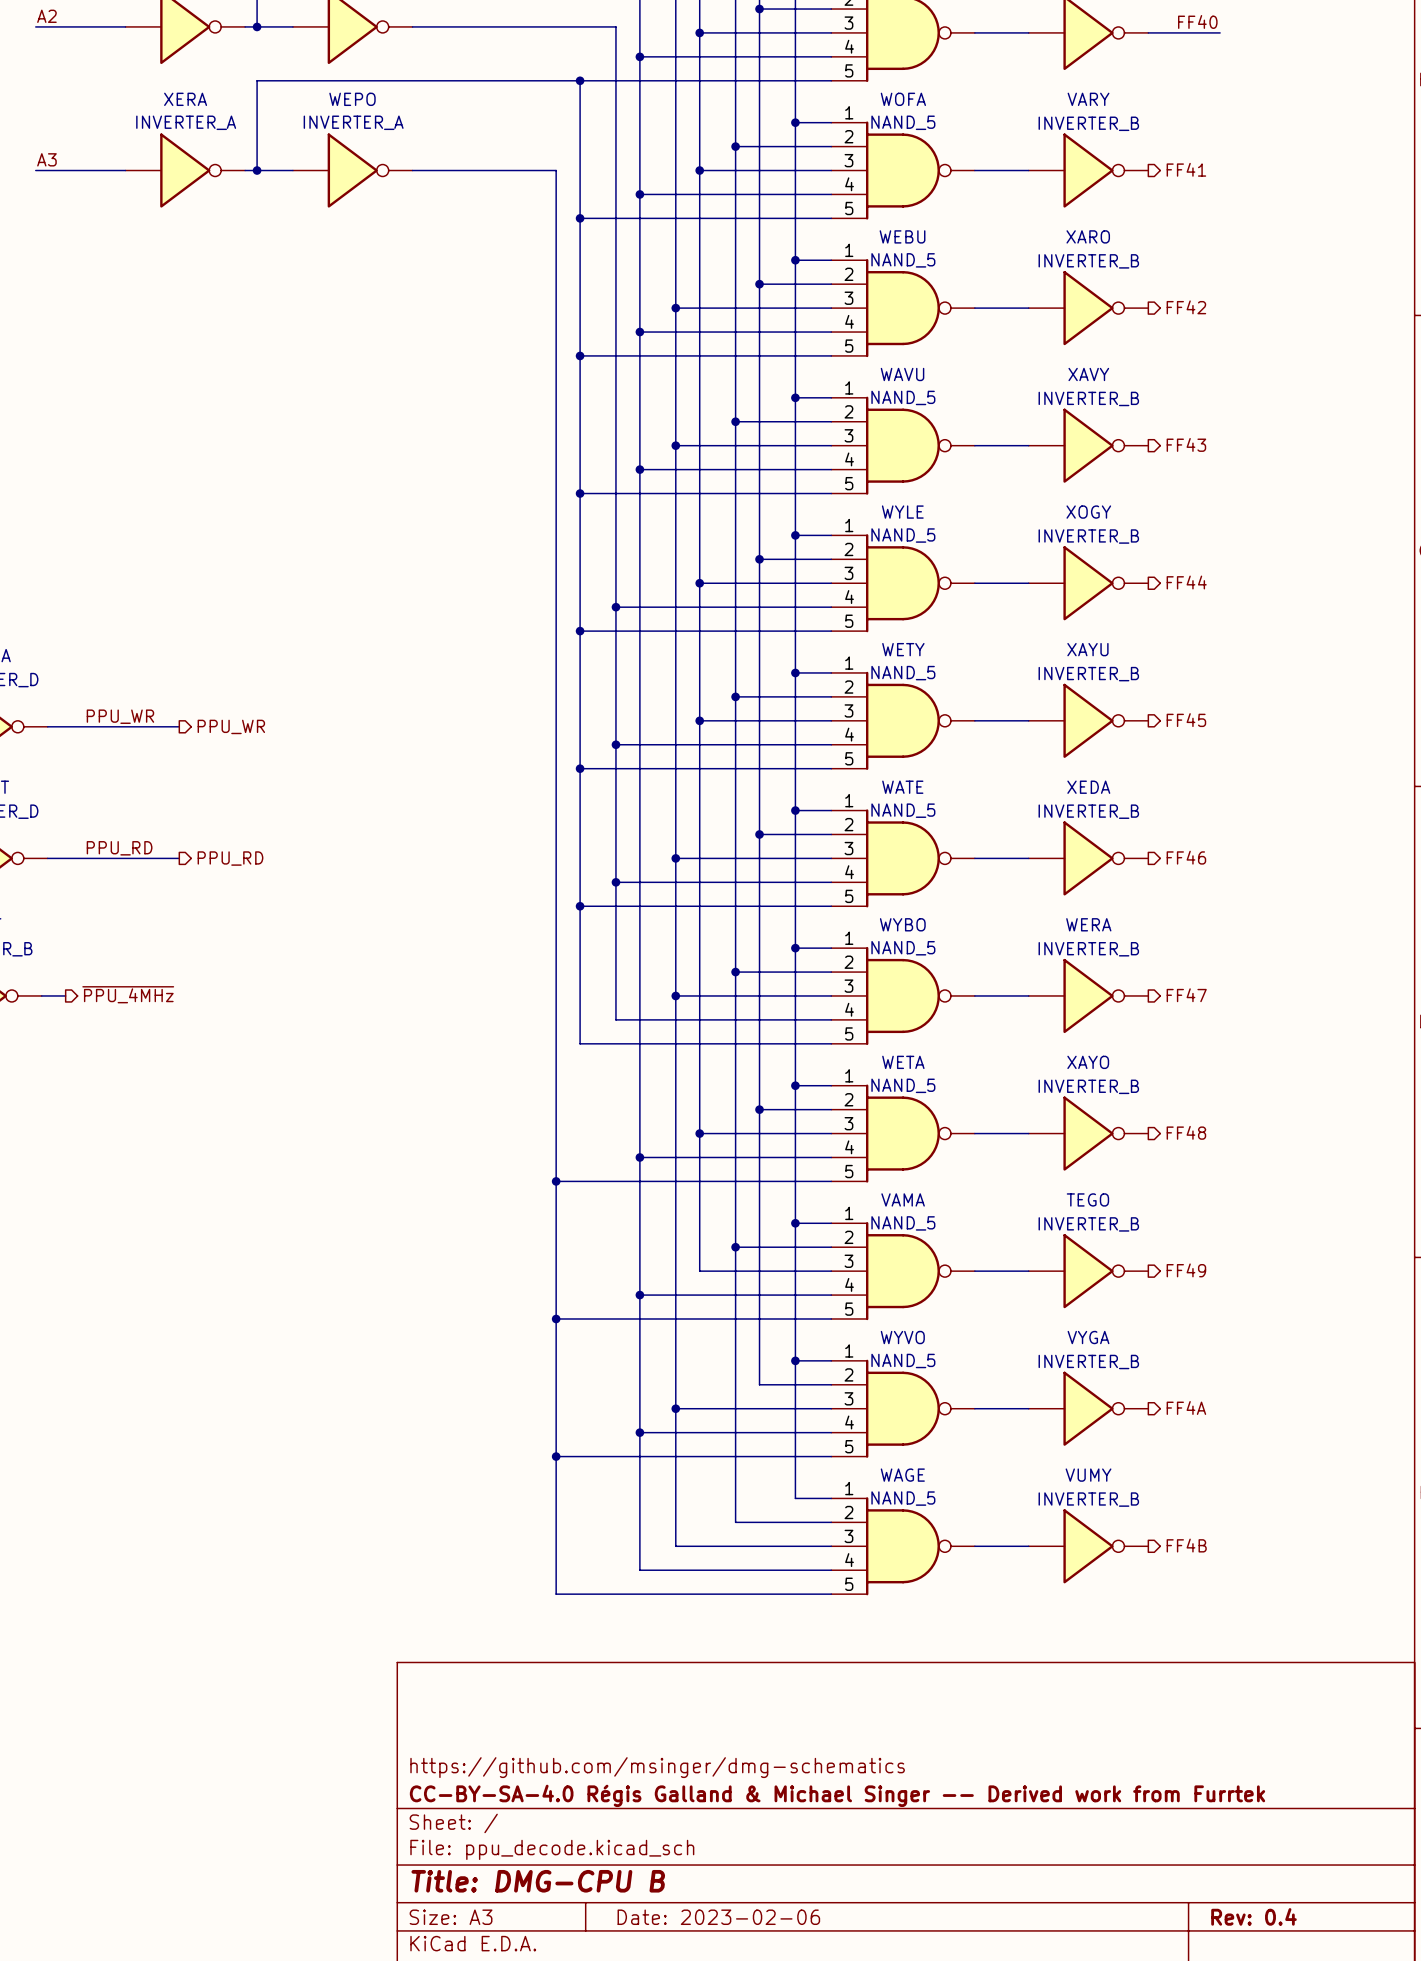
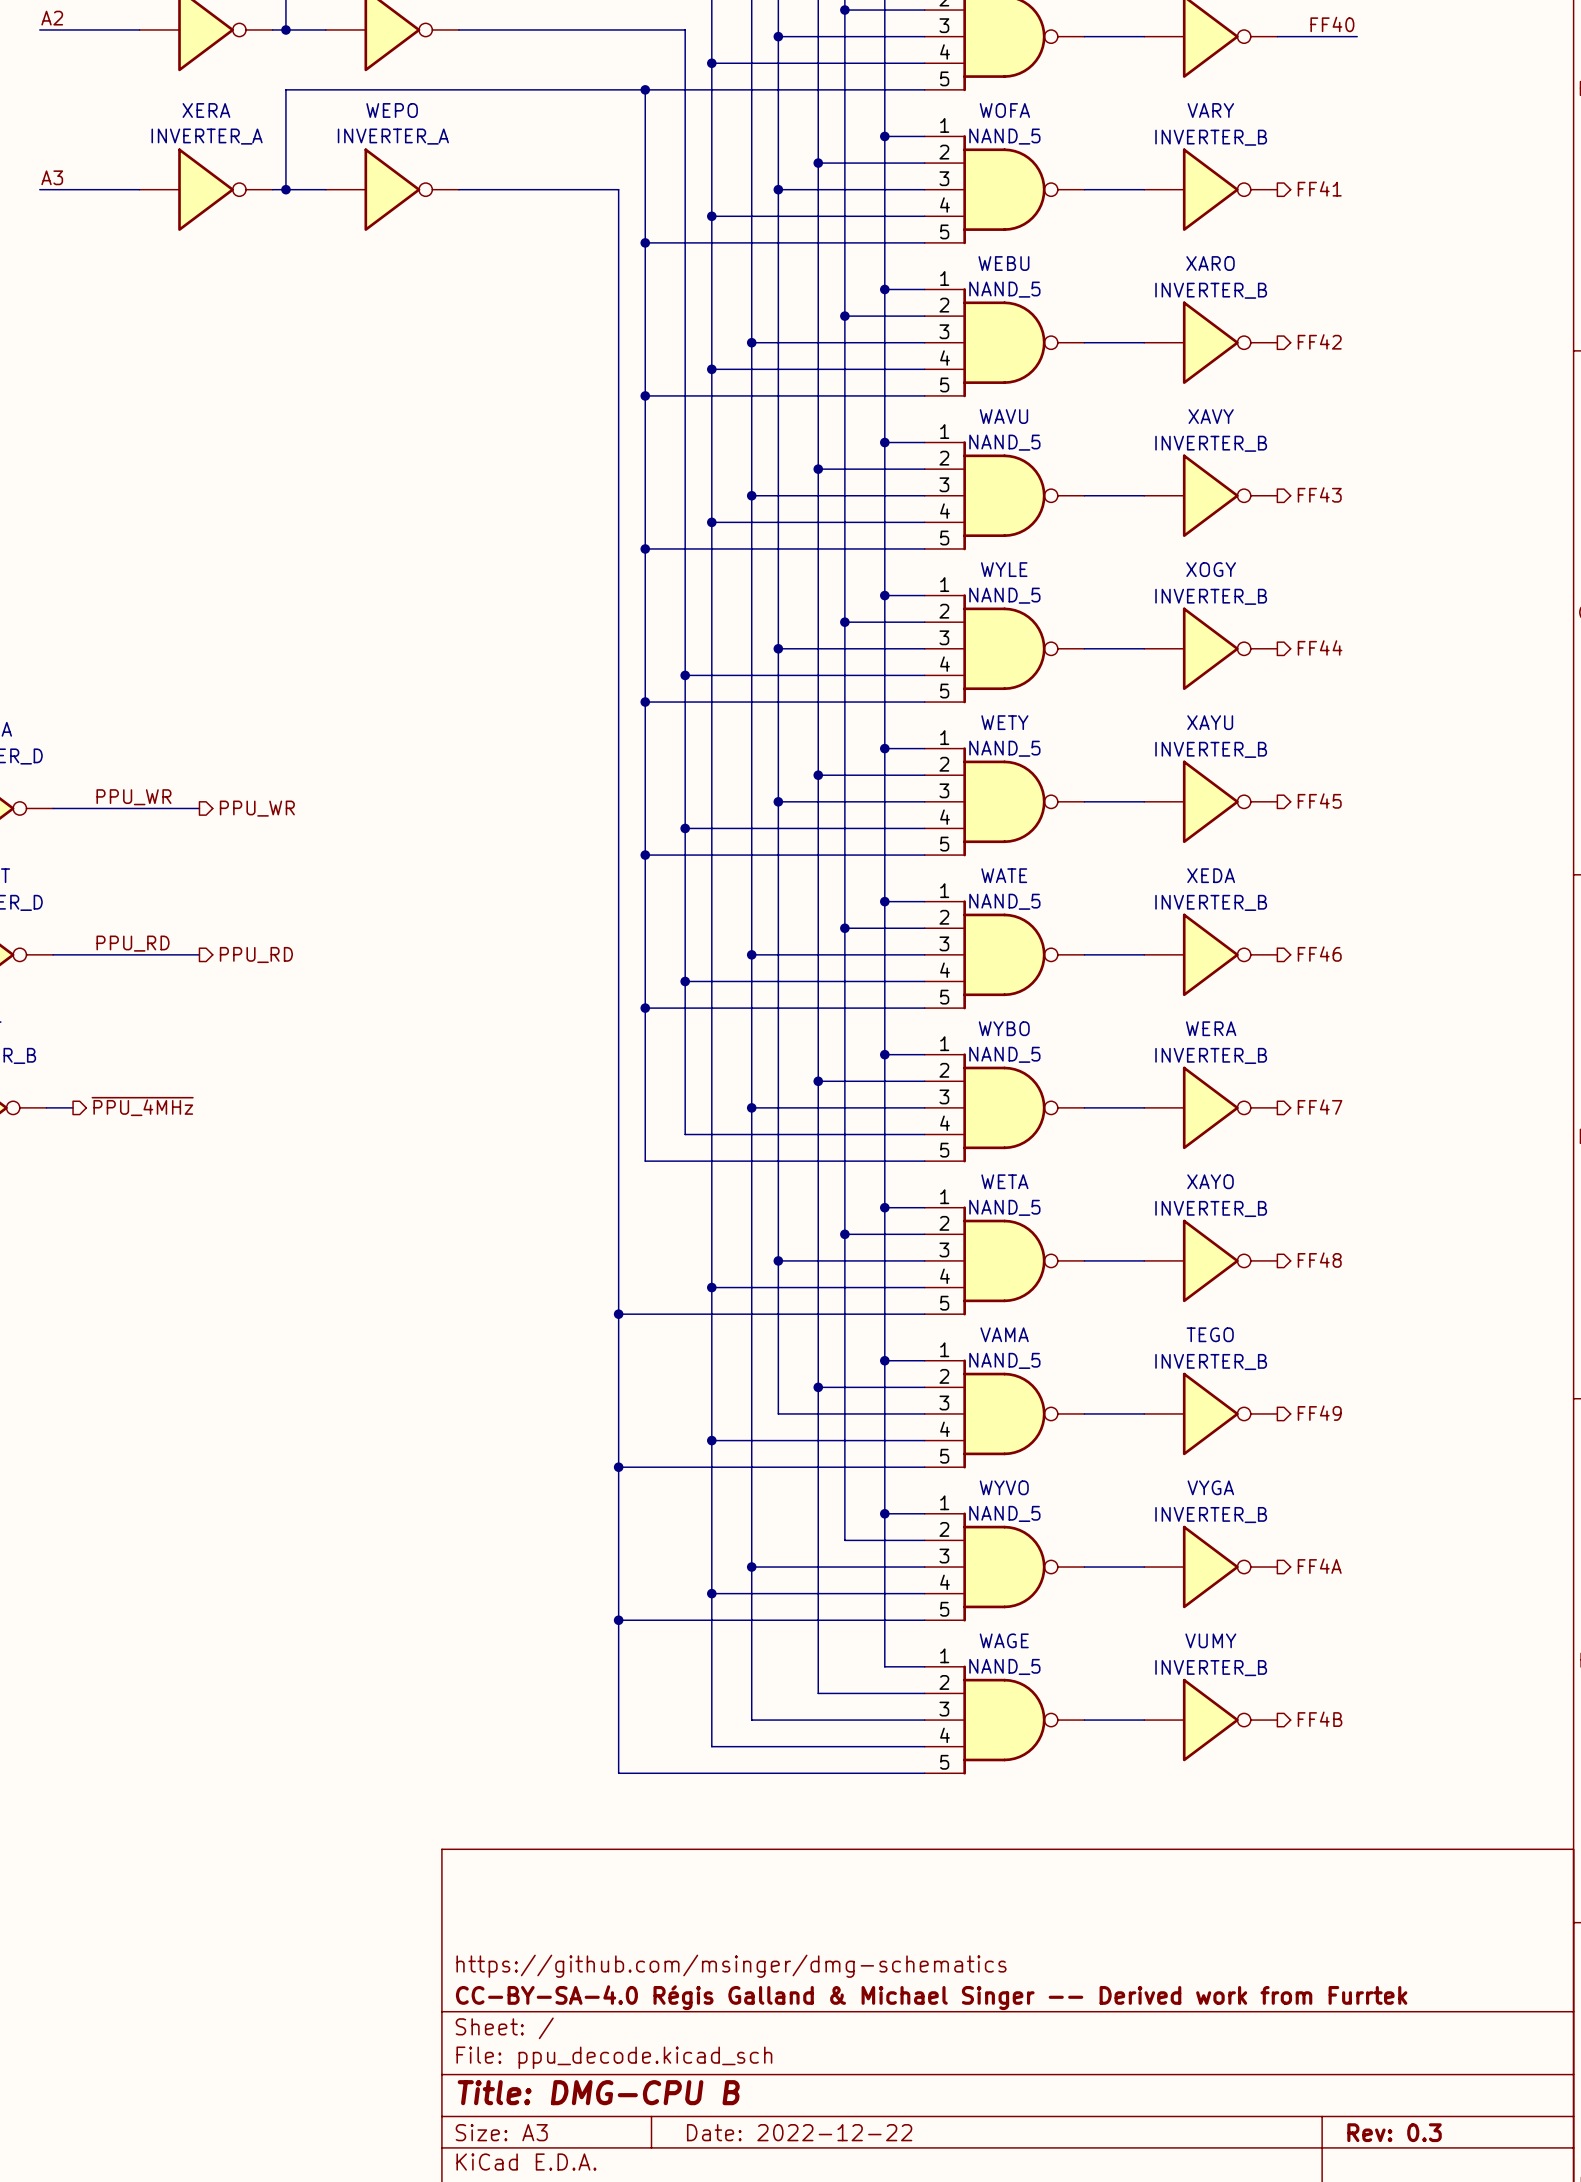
title block: Rev: 0.4 (1254, 1916) -> Rev: 0.3 (1394, 2132)
title block: Date: 2023-02-06 (718, 1917) -> Date: 2022-12-22 (799, 2132)

